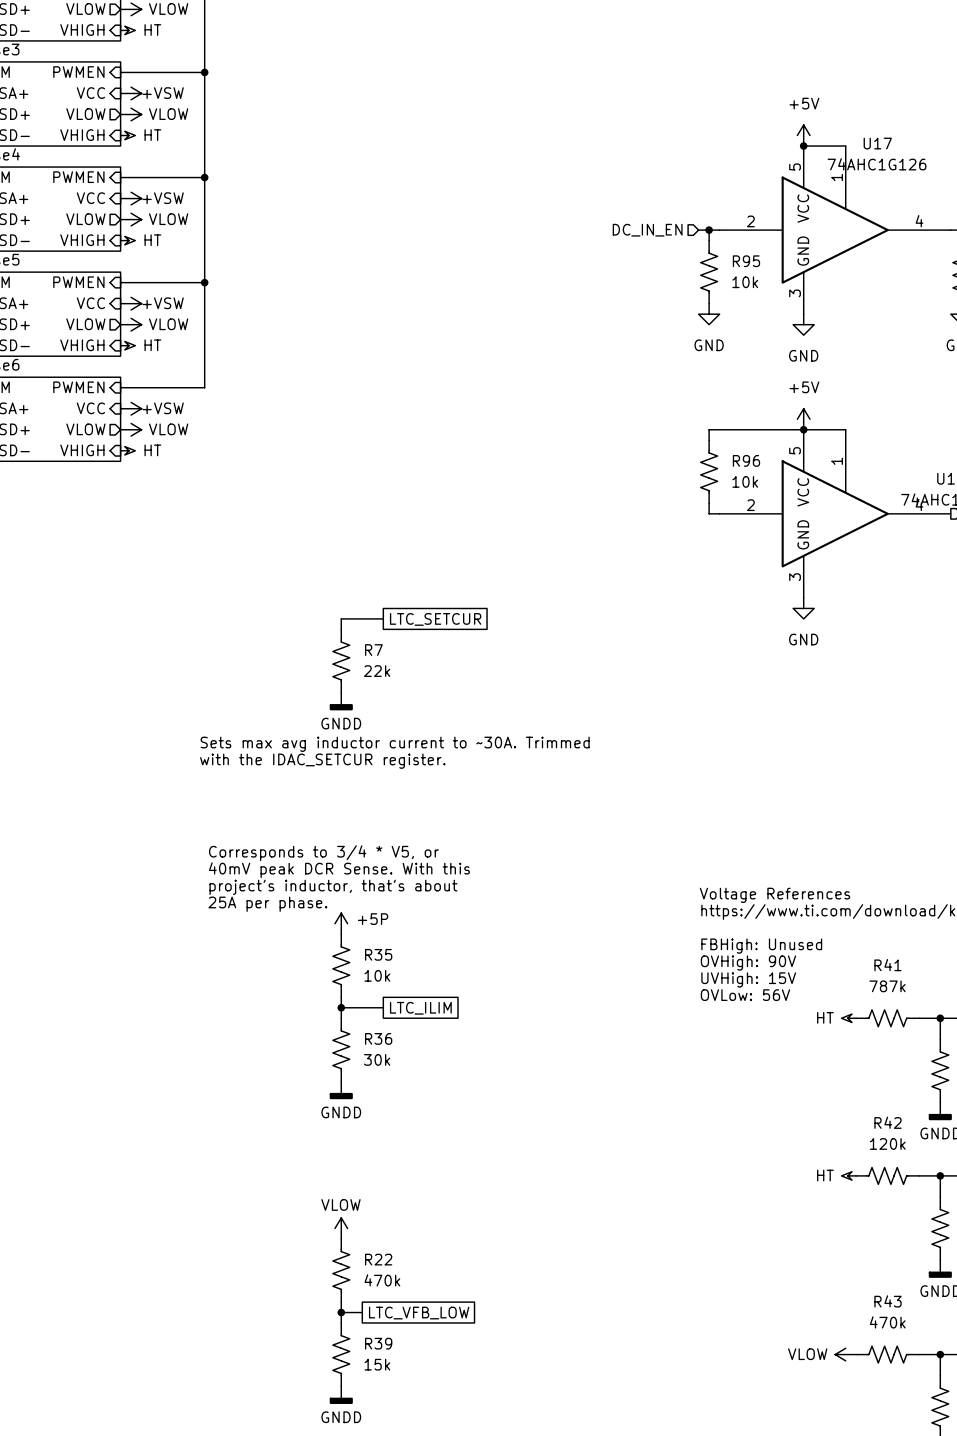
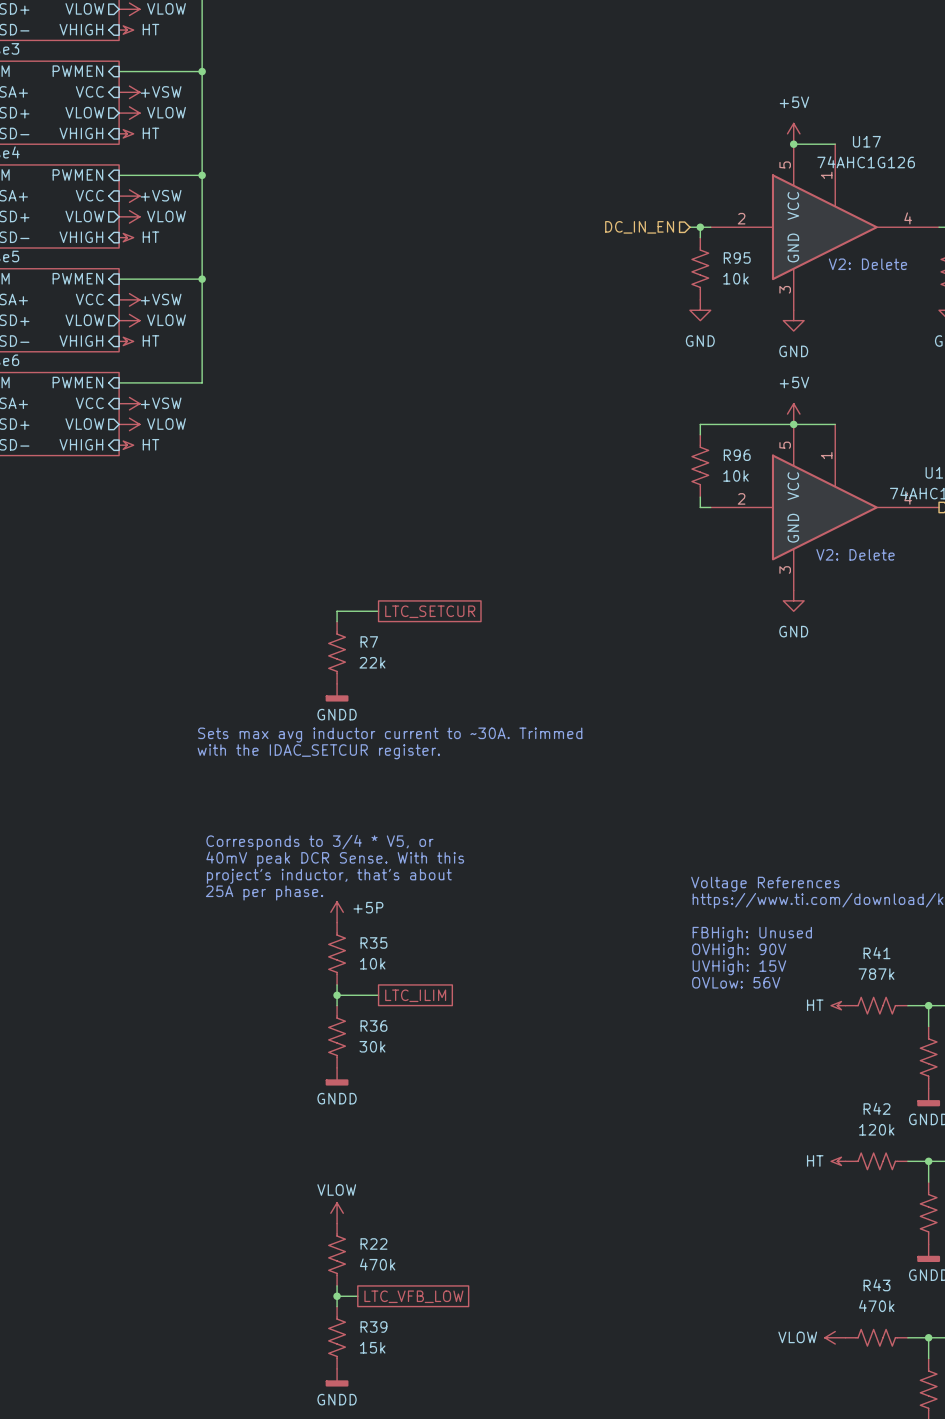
text: none -> V2: Delete (867, 264)
text: none -> V2: Delete (855, 554)

